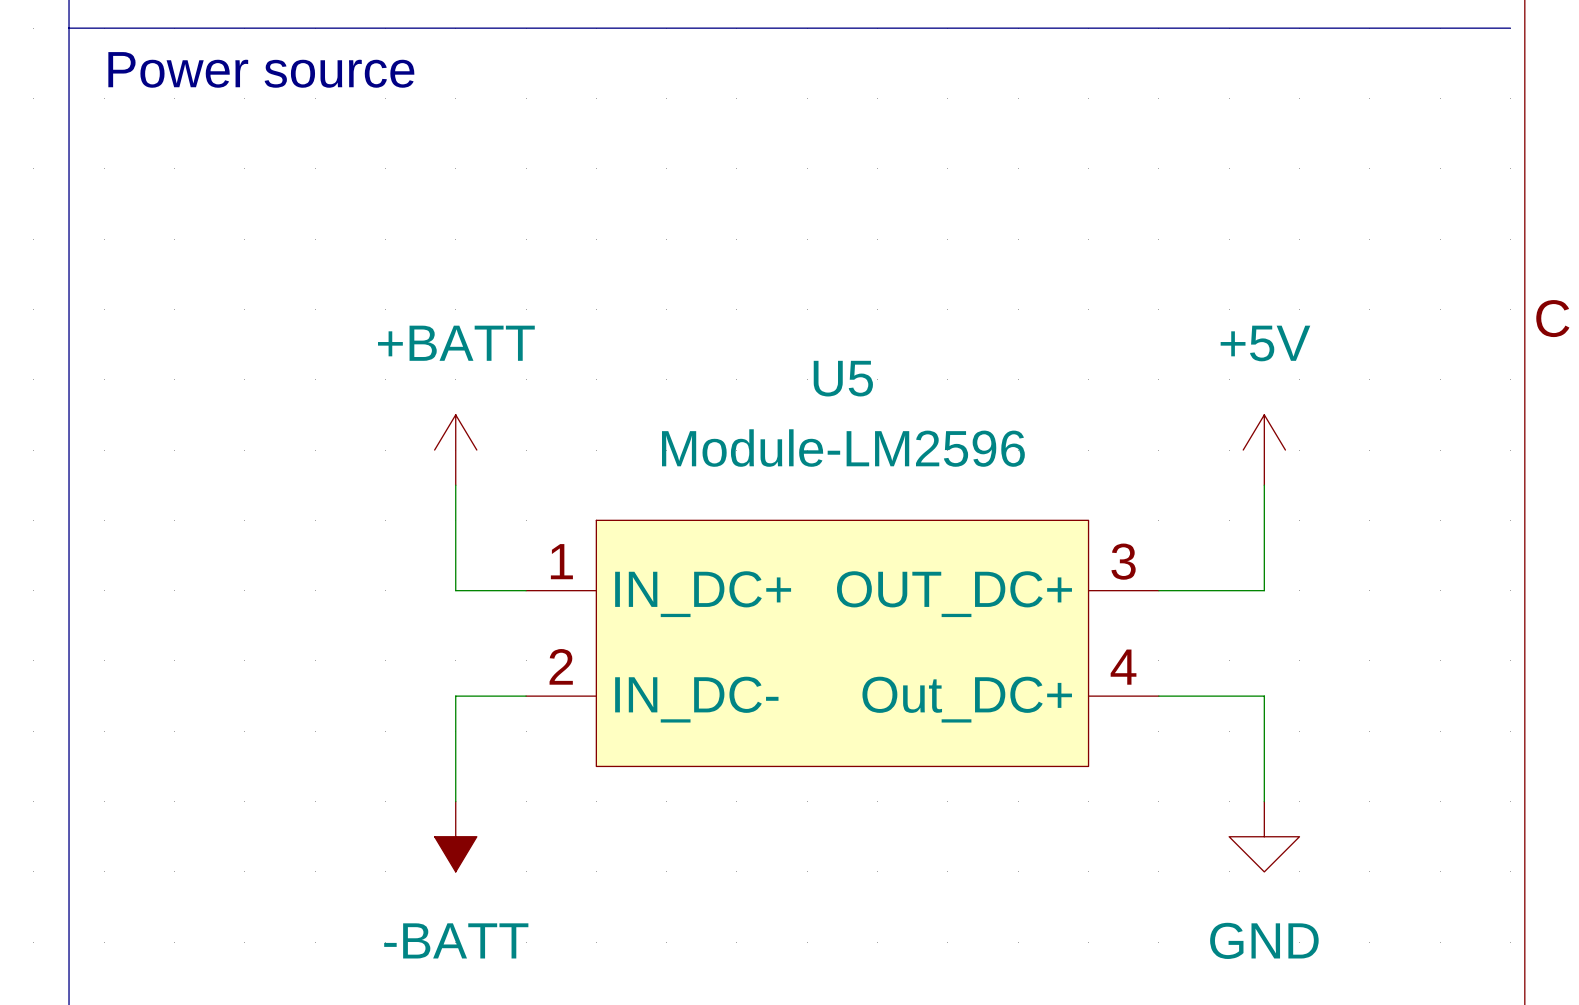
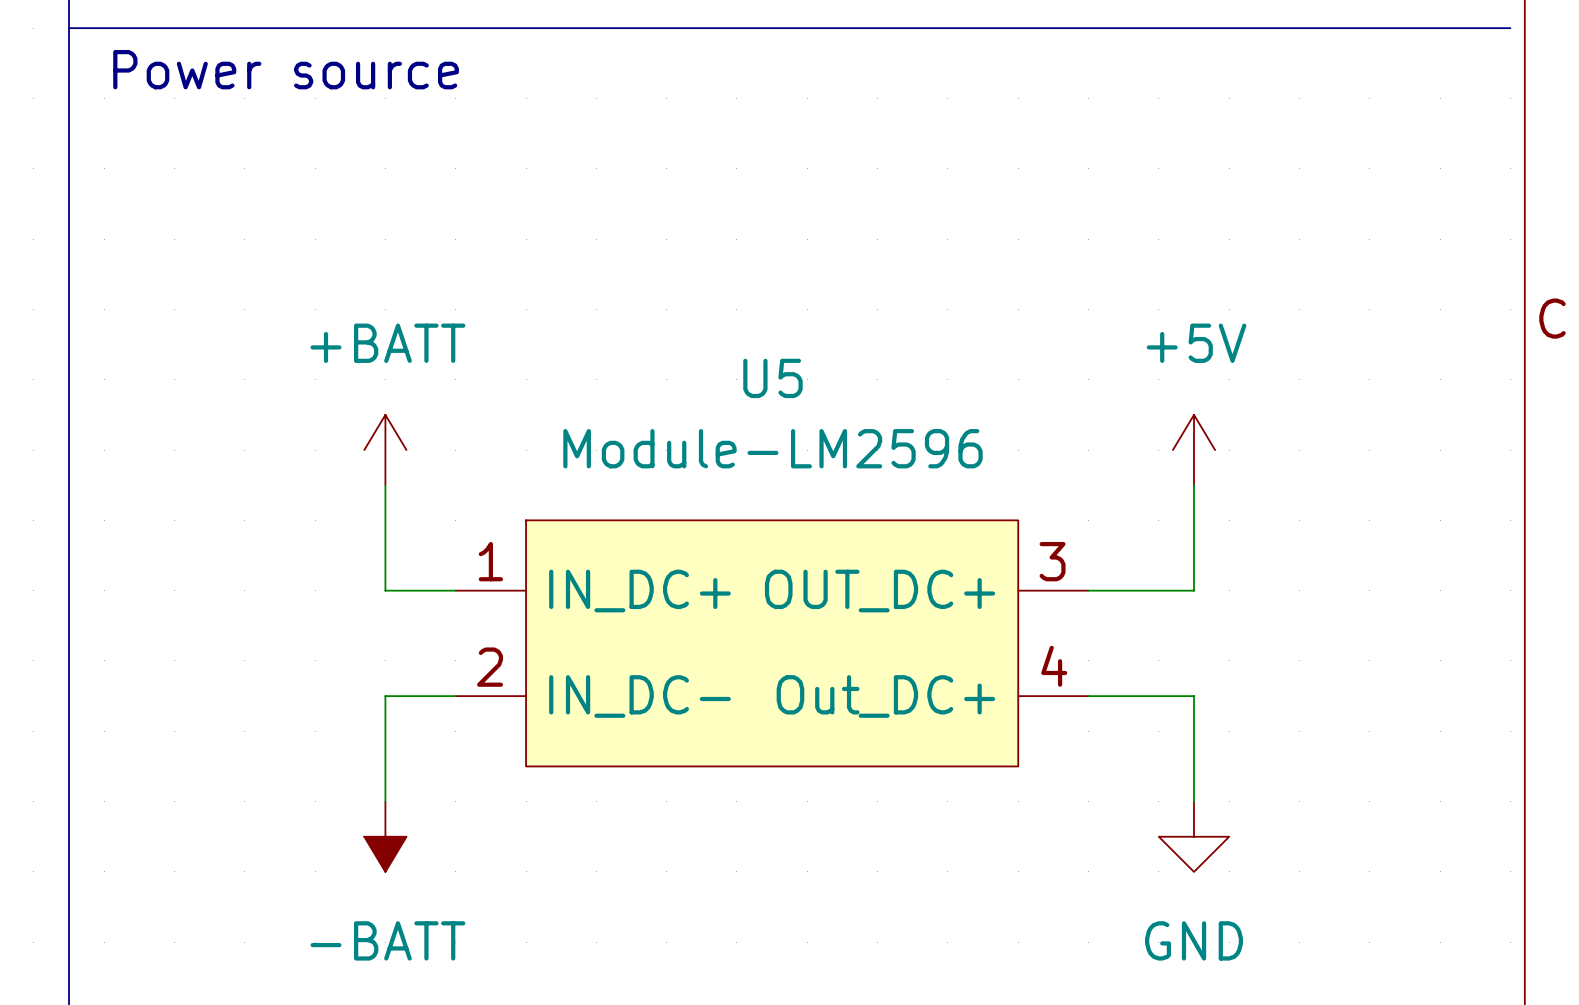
power symbol position: +BATT (455, 450) -> +BATT (385, 450)
power symbol position: +5V (1264, 450) -> +5V (1194, 450)
wire: (455, 485) (455, 590) (526, 590) -> (385, 485) (385, 590) (455, 590)
wire: (1264, 485) (1264, 590) (1194, 590) -> (1194, 485) (1194, 590)
U5 position: (842, 643) -> (772, 643)
wire: (526, 696) (455, 696) (455, 801) -> (455, 696) (385, 696) (385, 801)
wire: (1194, 696) (1264, 696) (1264, 801) -> (1194, 696) (1194, 801)
power symbol position: -BATT (455, 836) -> -BATT (385, 836)
power symbol position: GND (1264, 836) -> GND (1194, 836)

